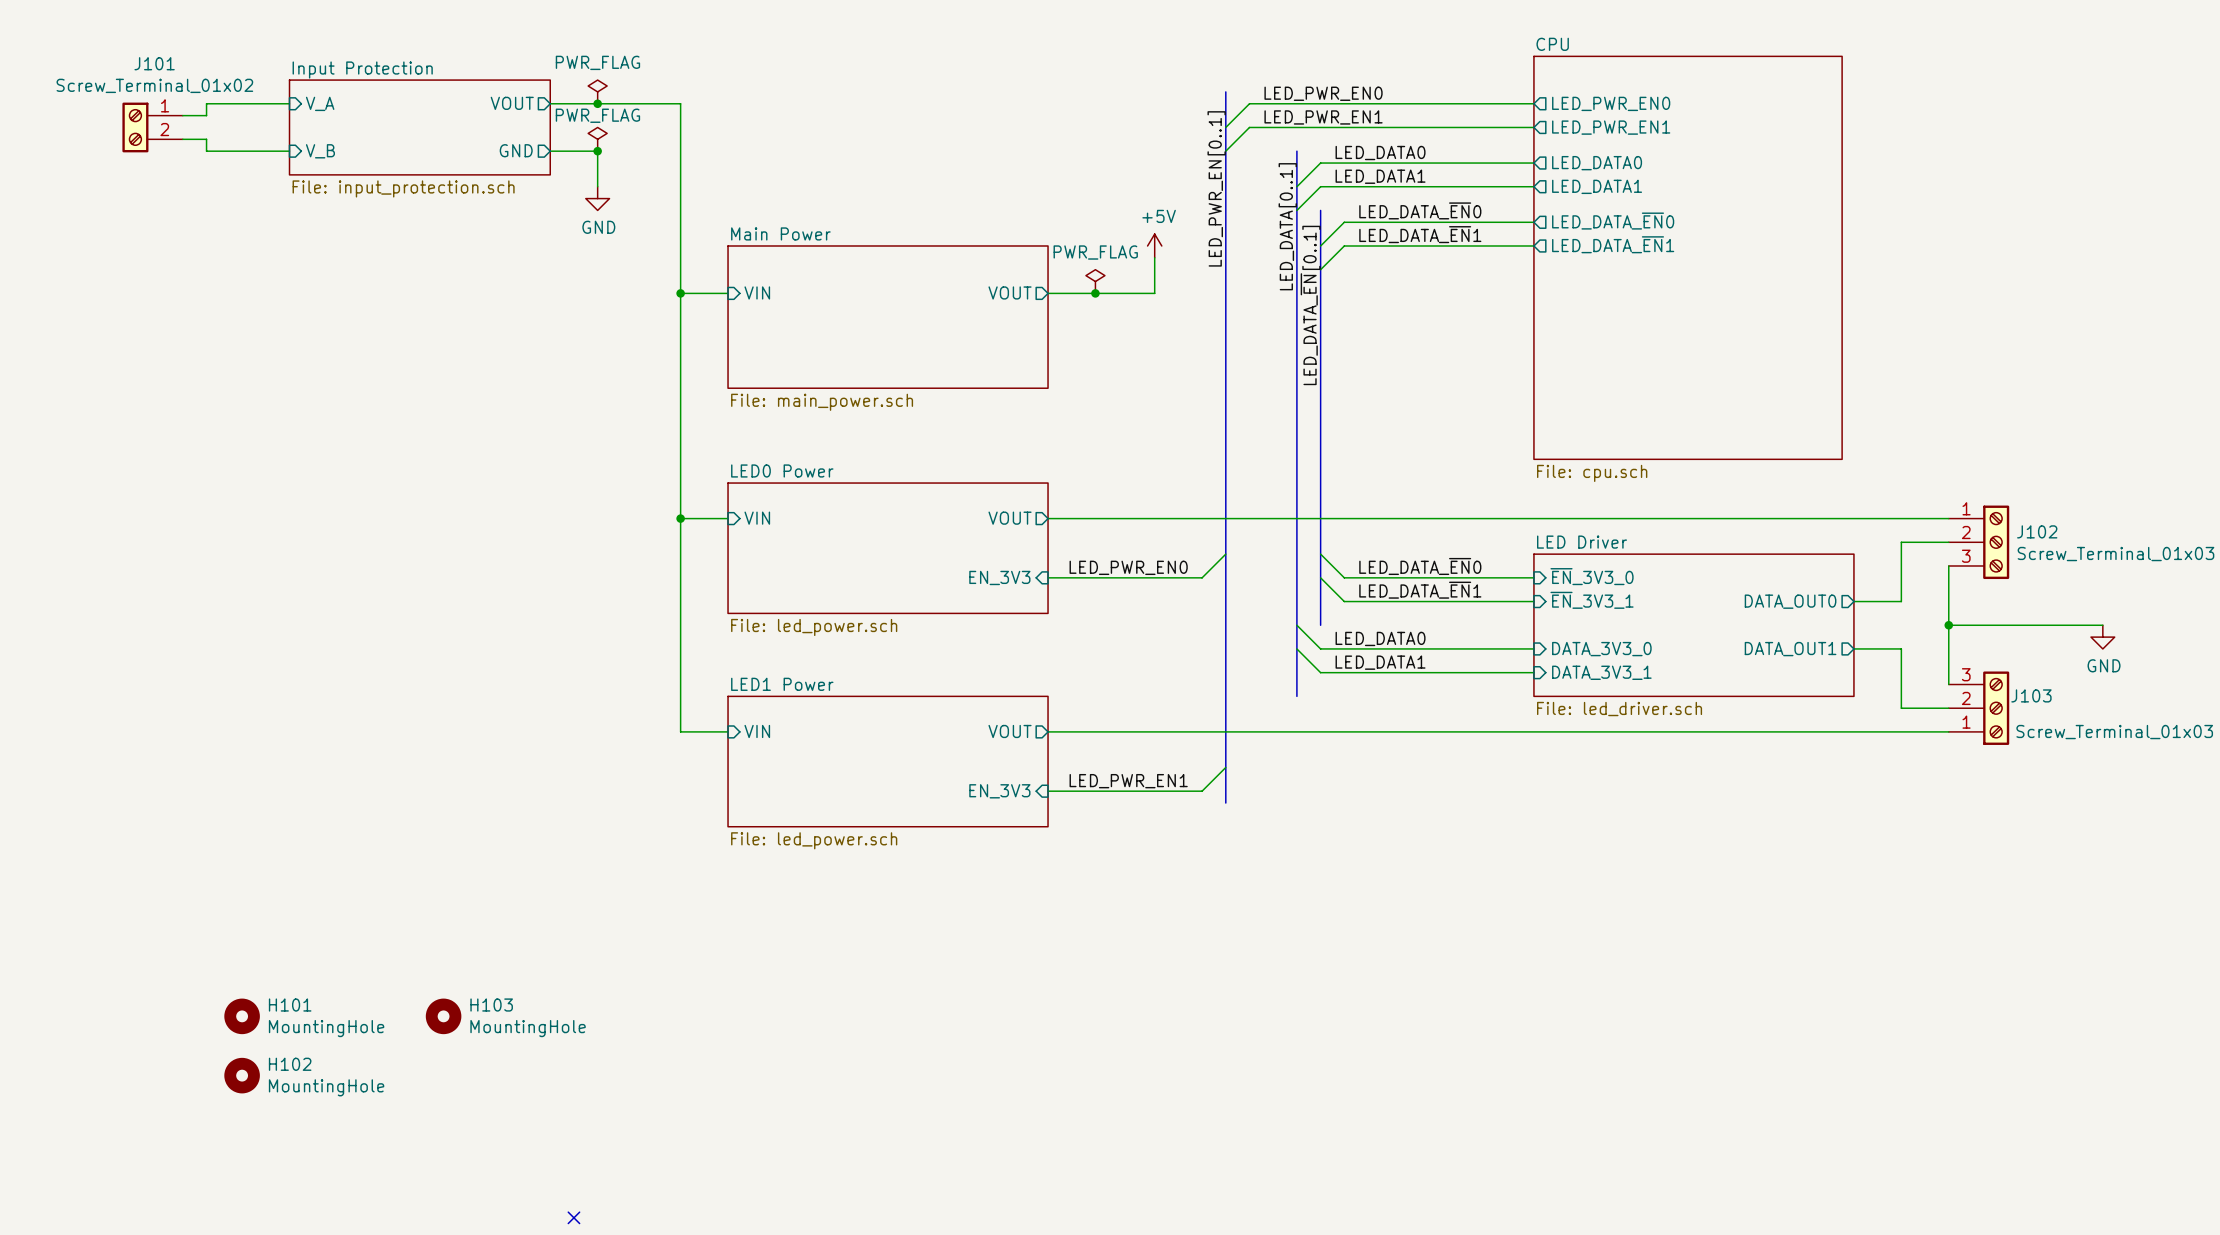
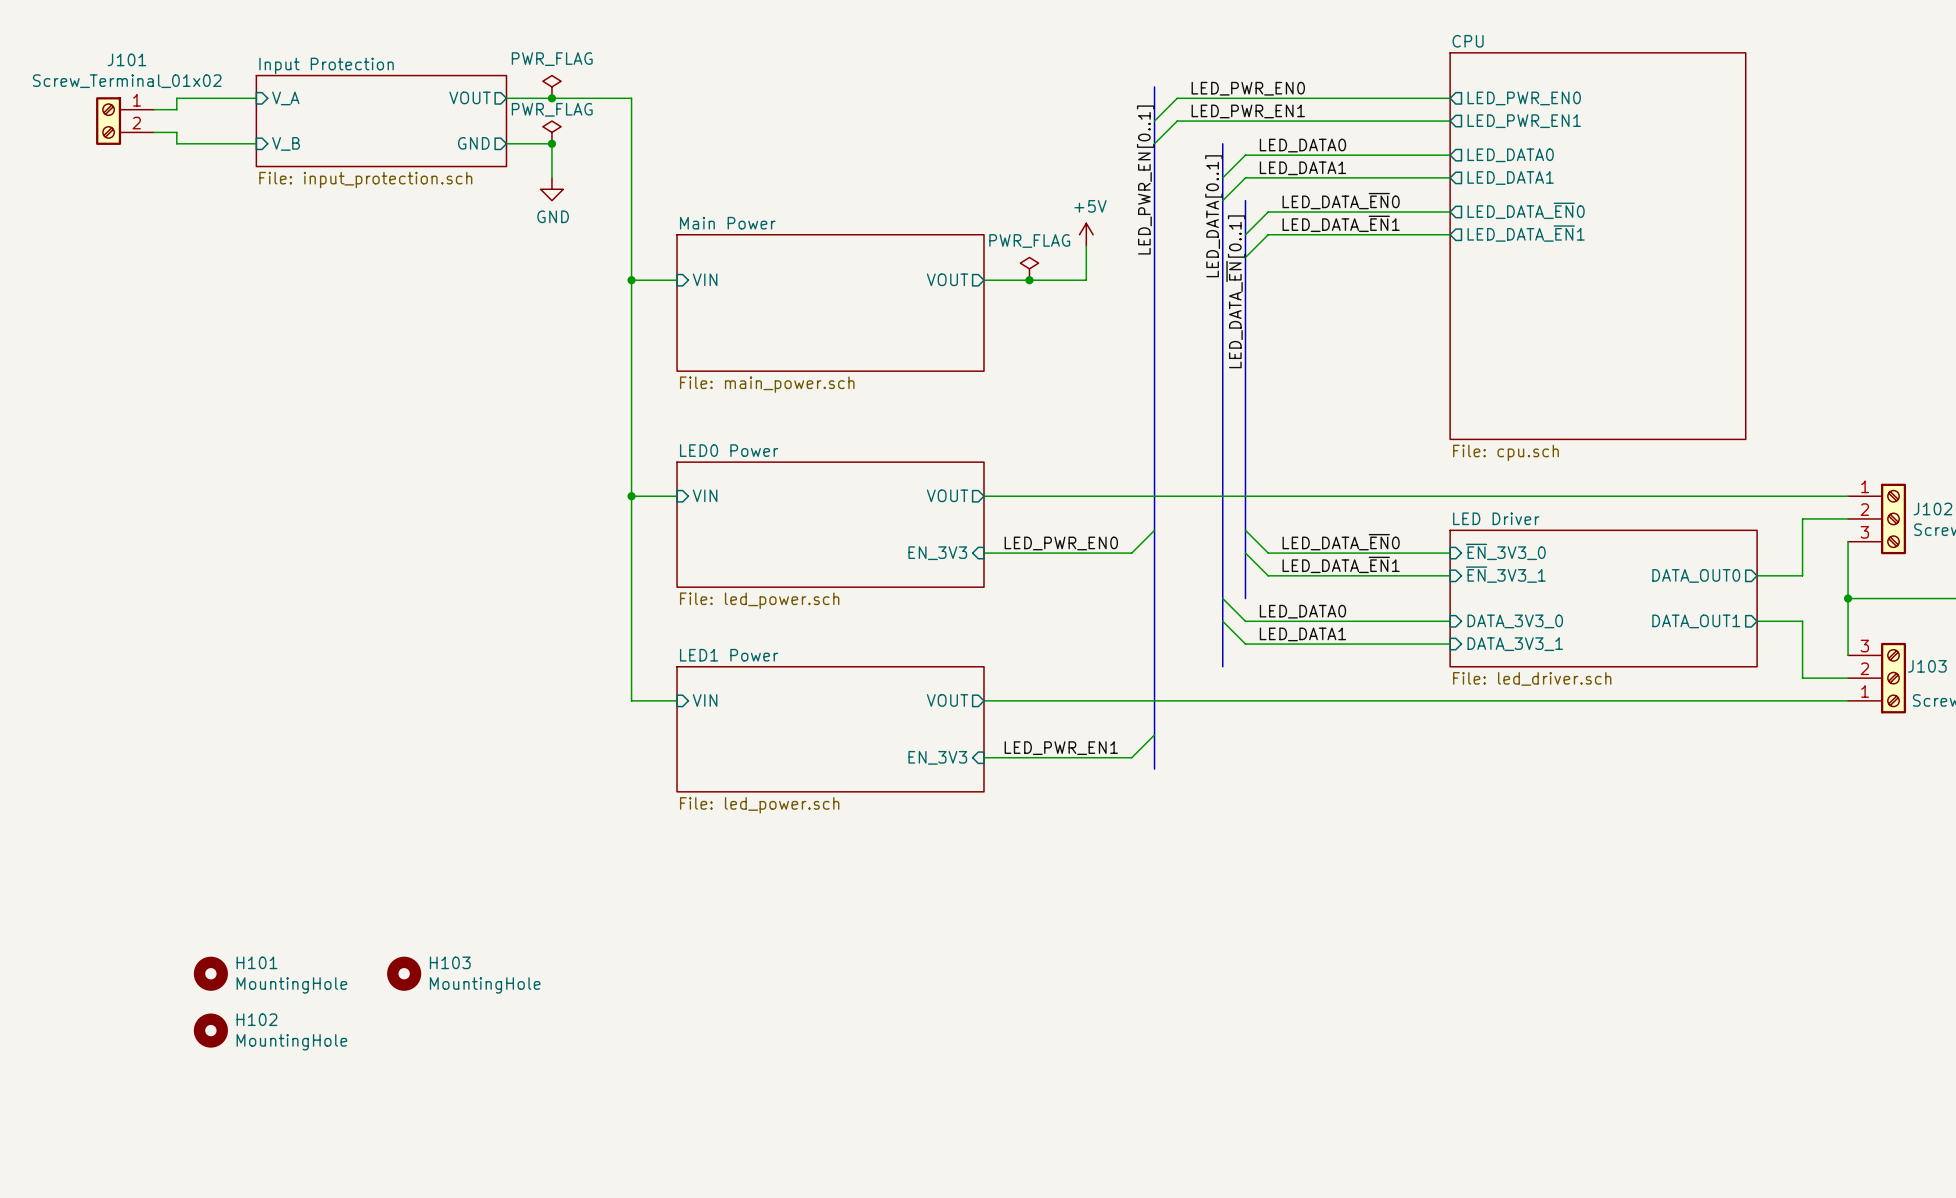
no-connect mark: (573, 1217) -> none

